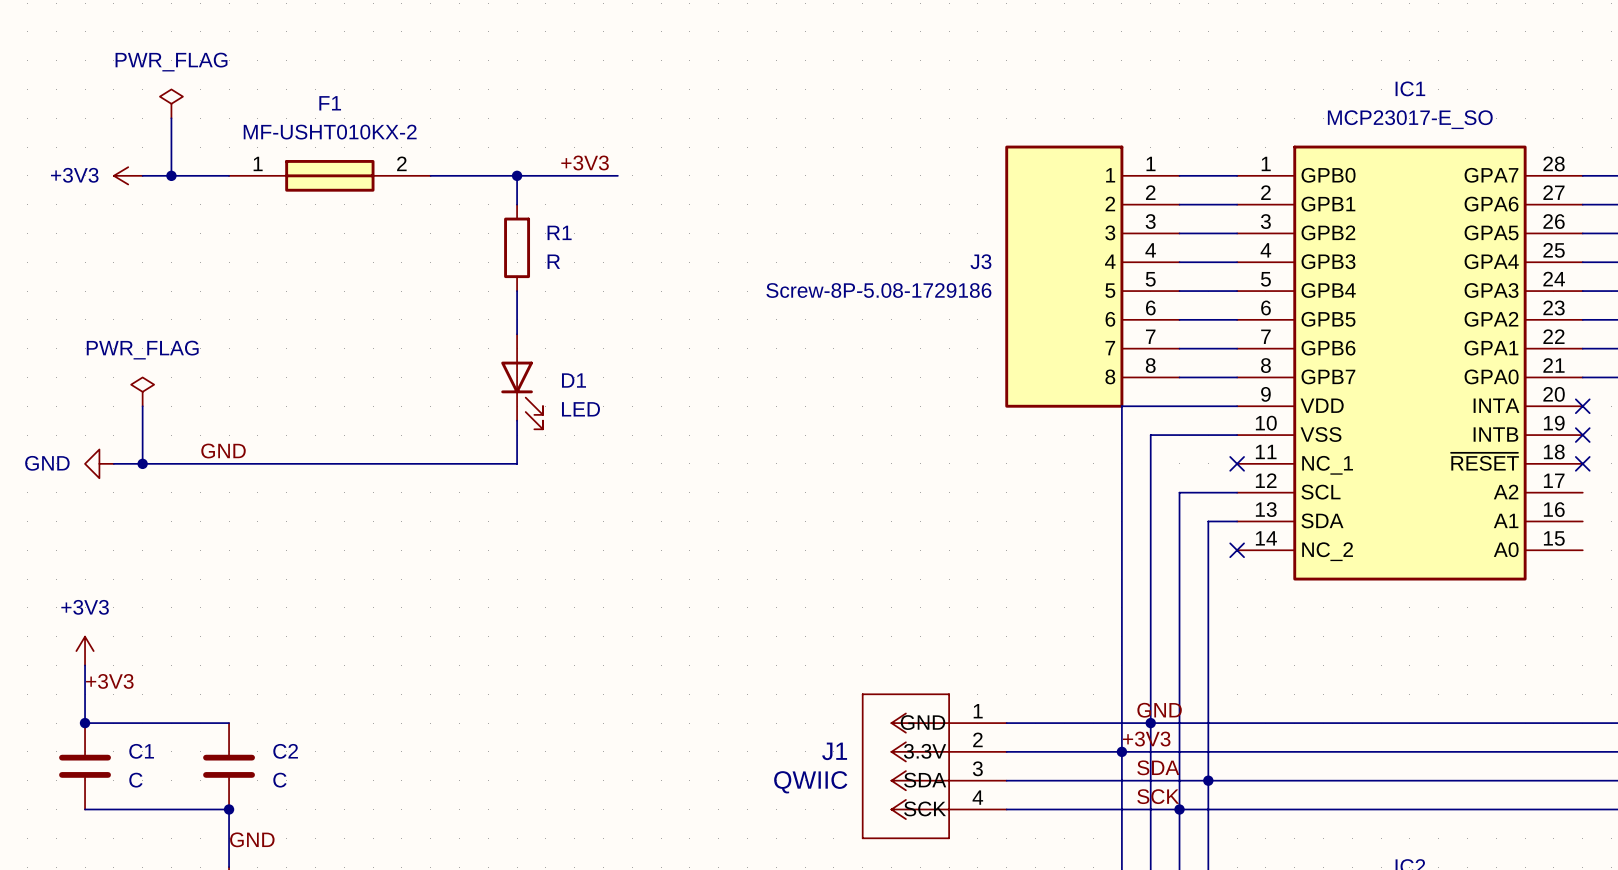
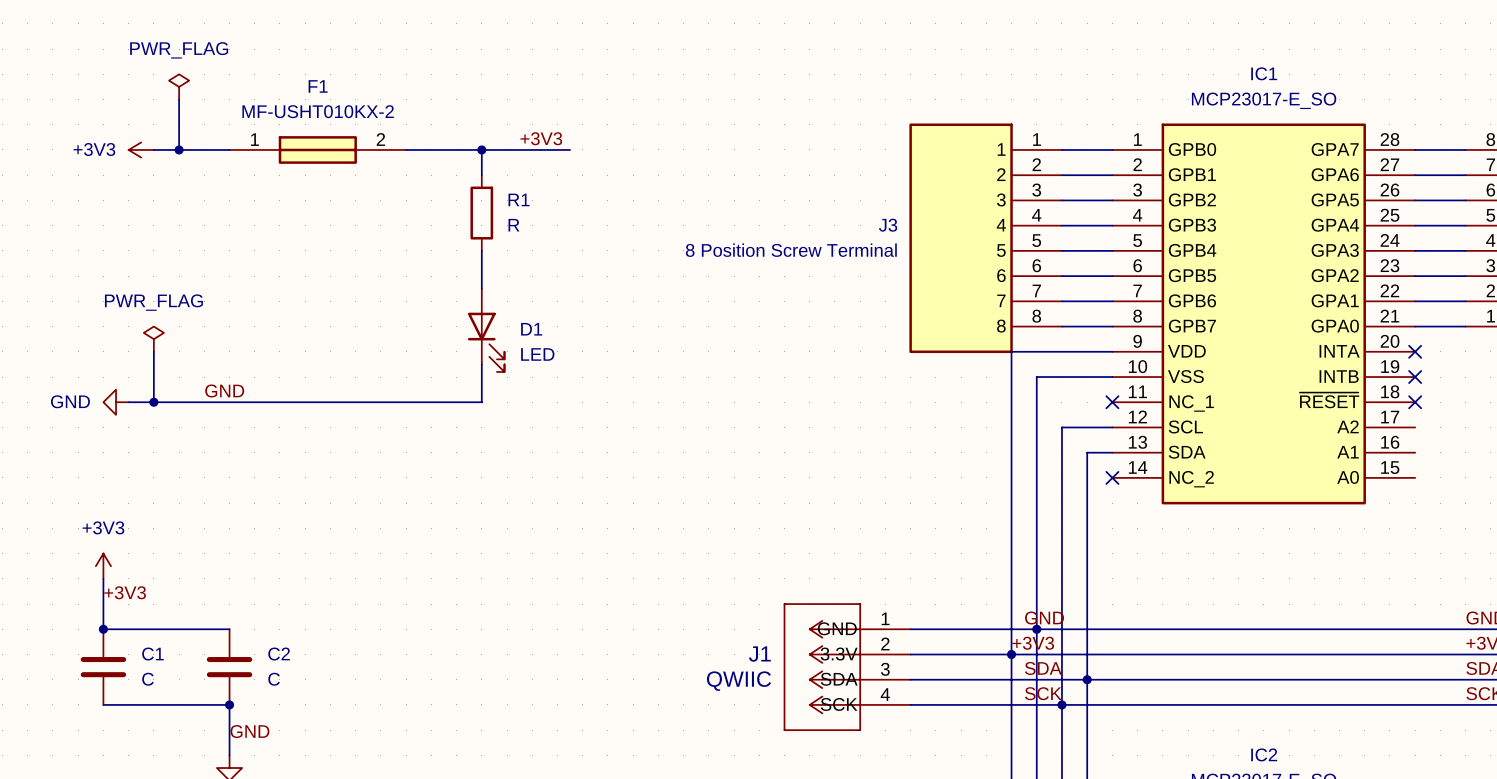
J3 value: Screw-8P-5.08-1729186 (878, 290) -> 8 Position Screw Terminal (791, 250)

